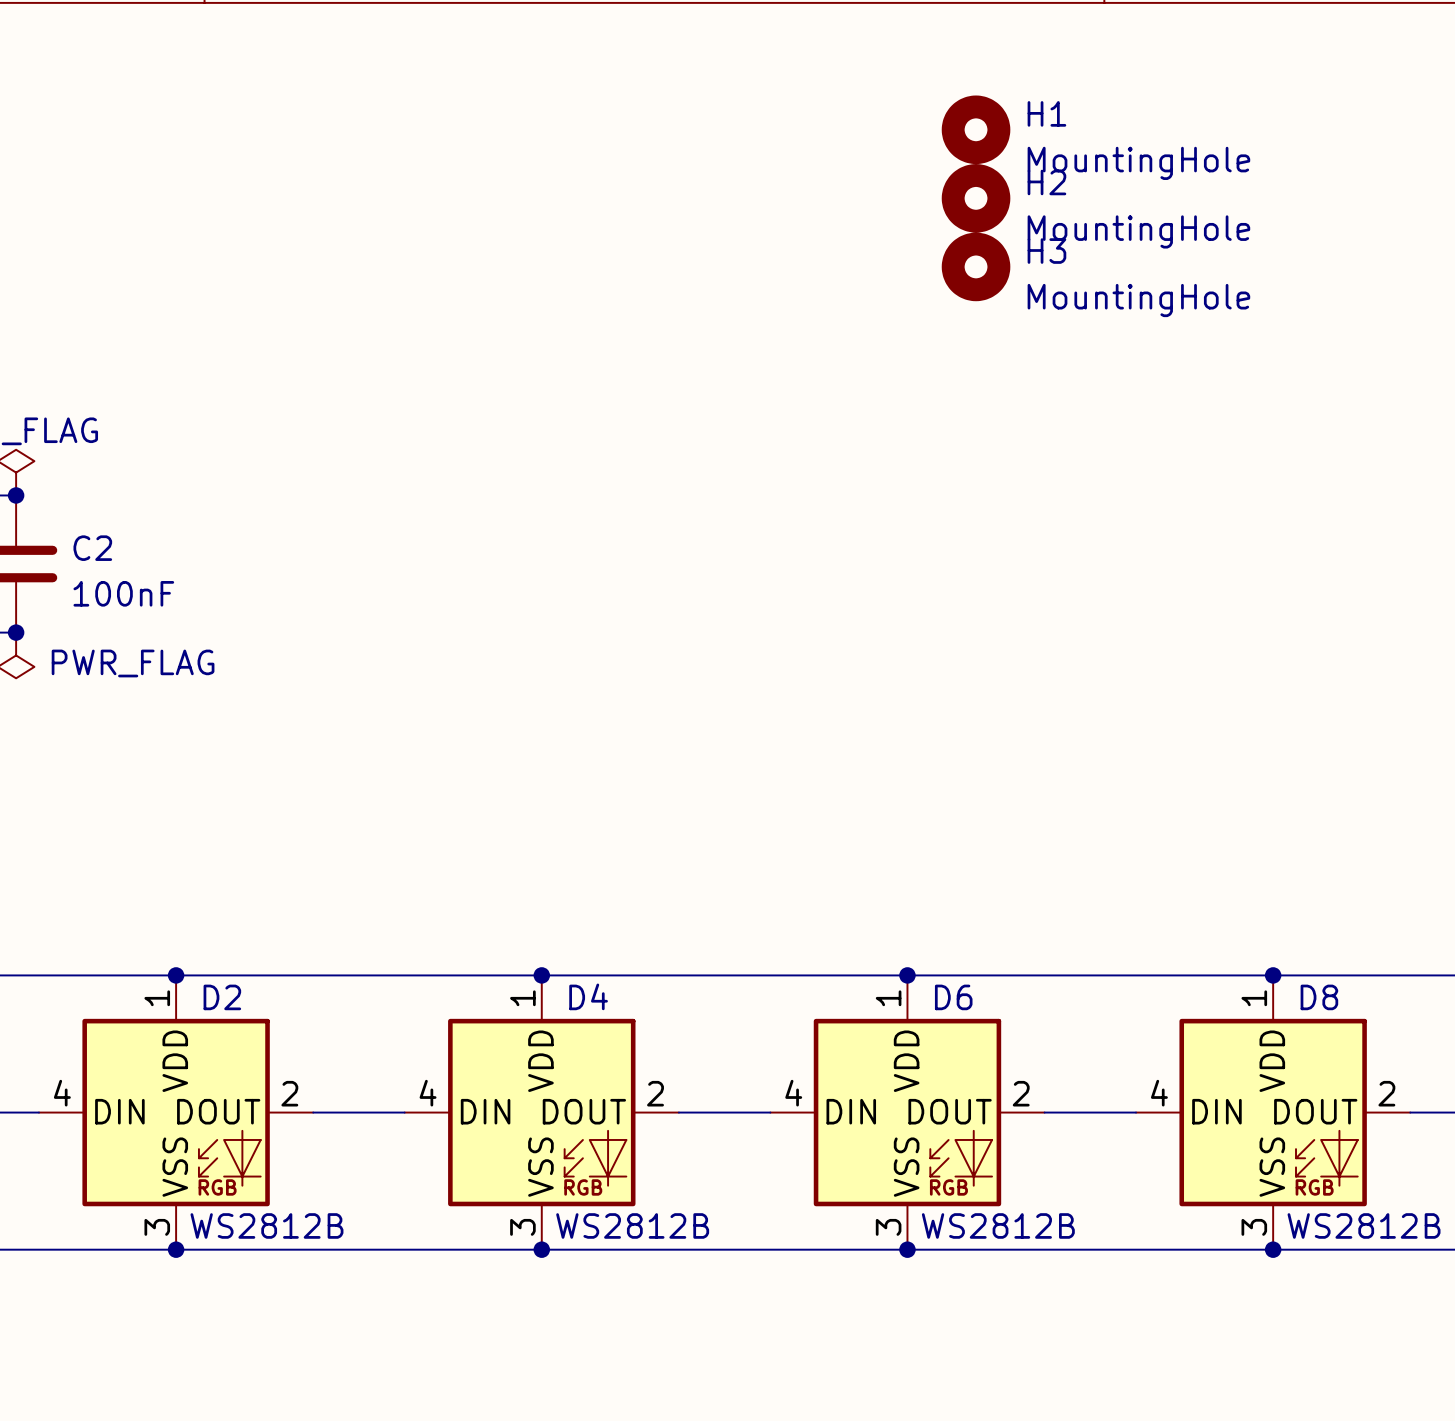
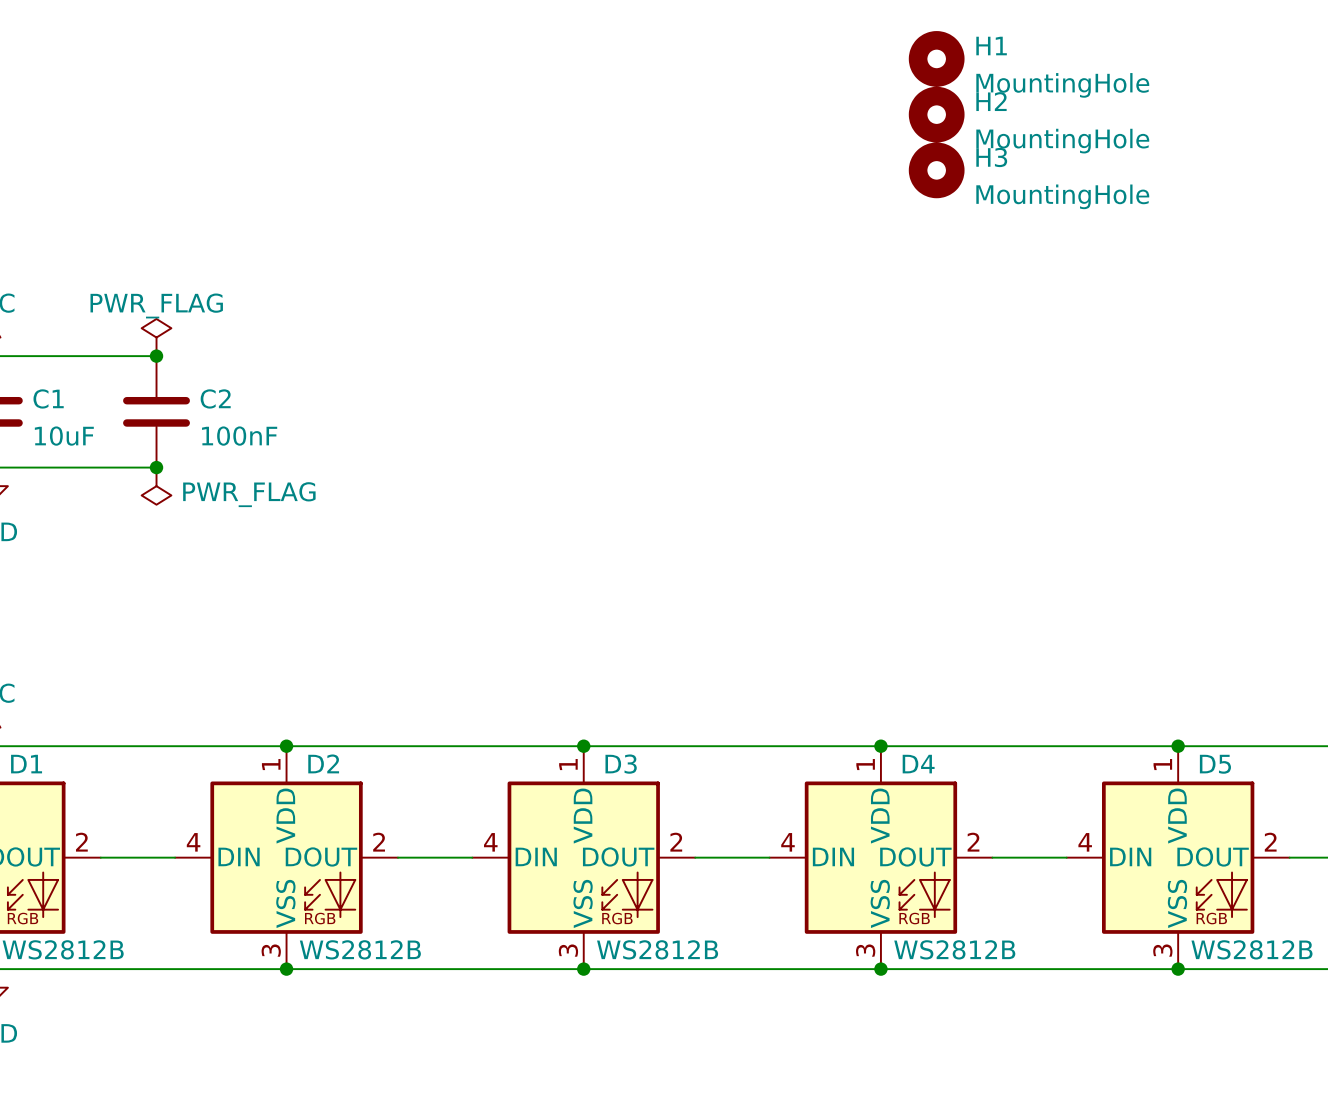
D4 name: D4 (588, 996) -> D3 (621, 764)
D6 name: D6 (953, 997) -> D4 (918, 764)
D8 name: D8 (1319, 997) -> D5 (1215, 764)

